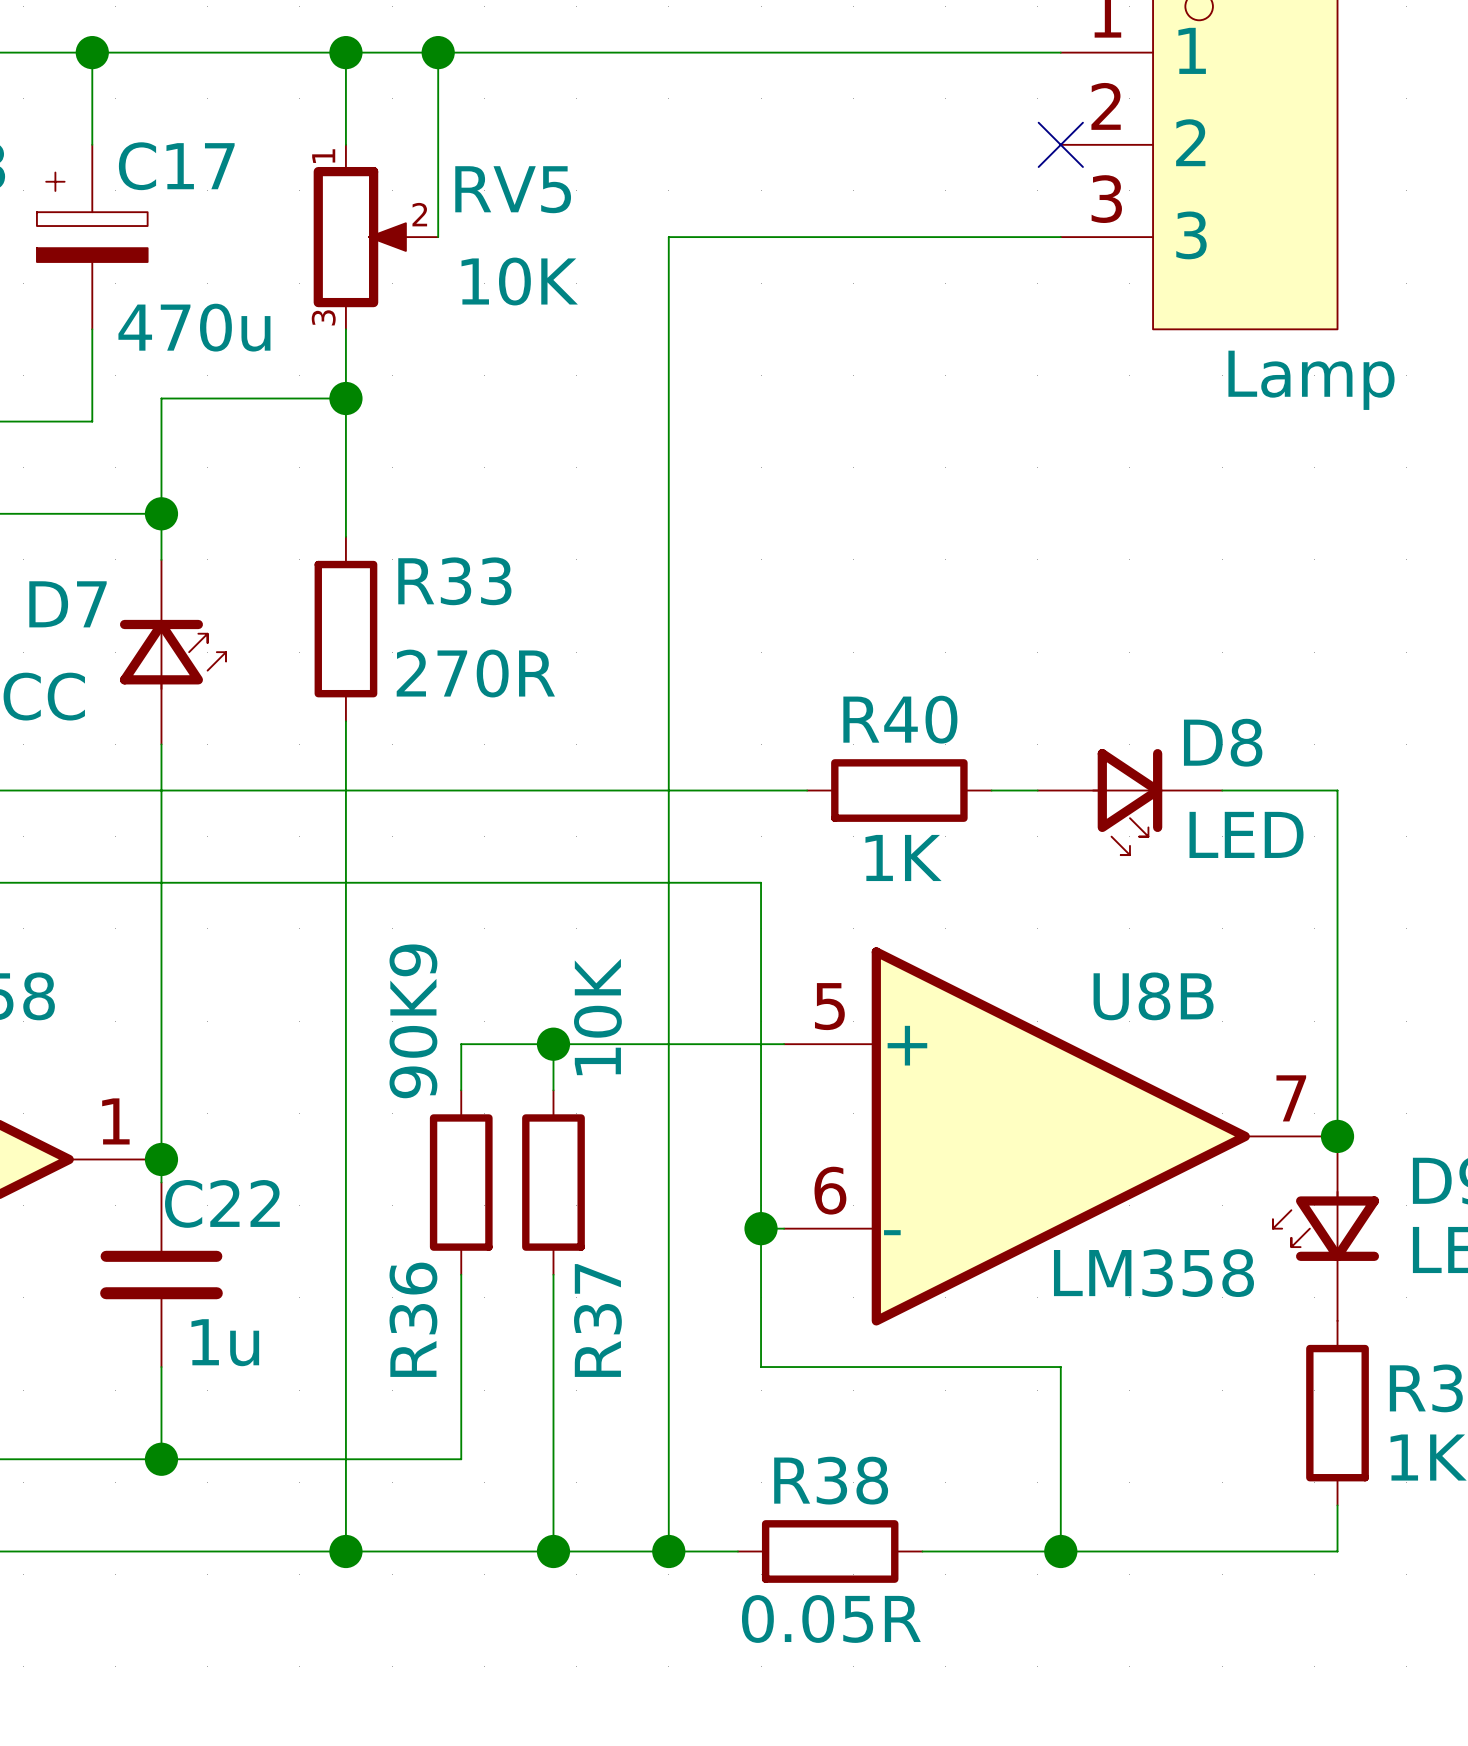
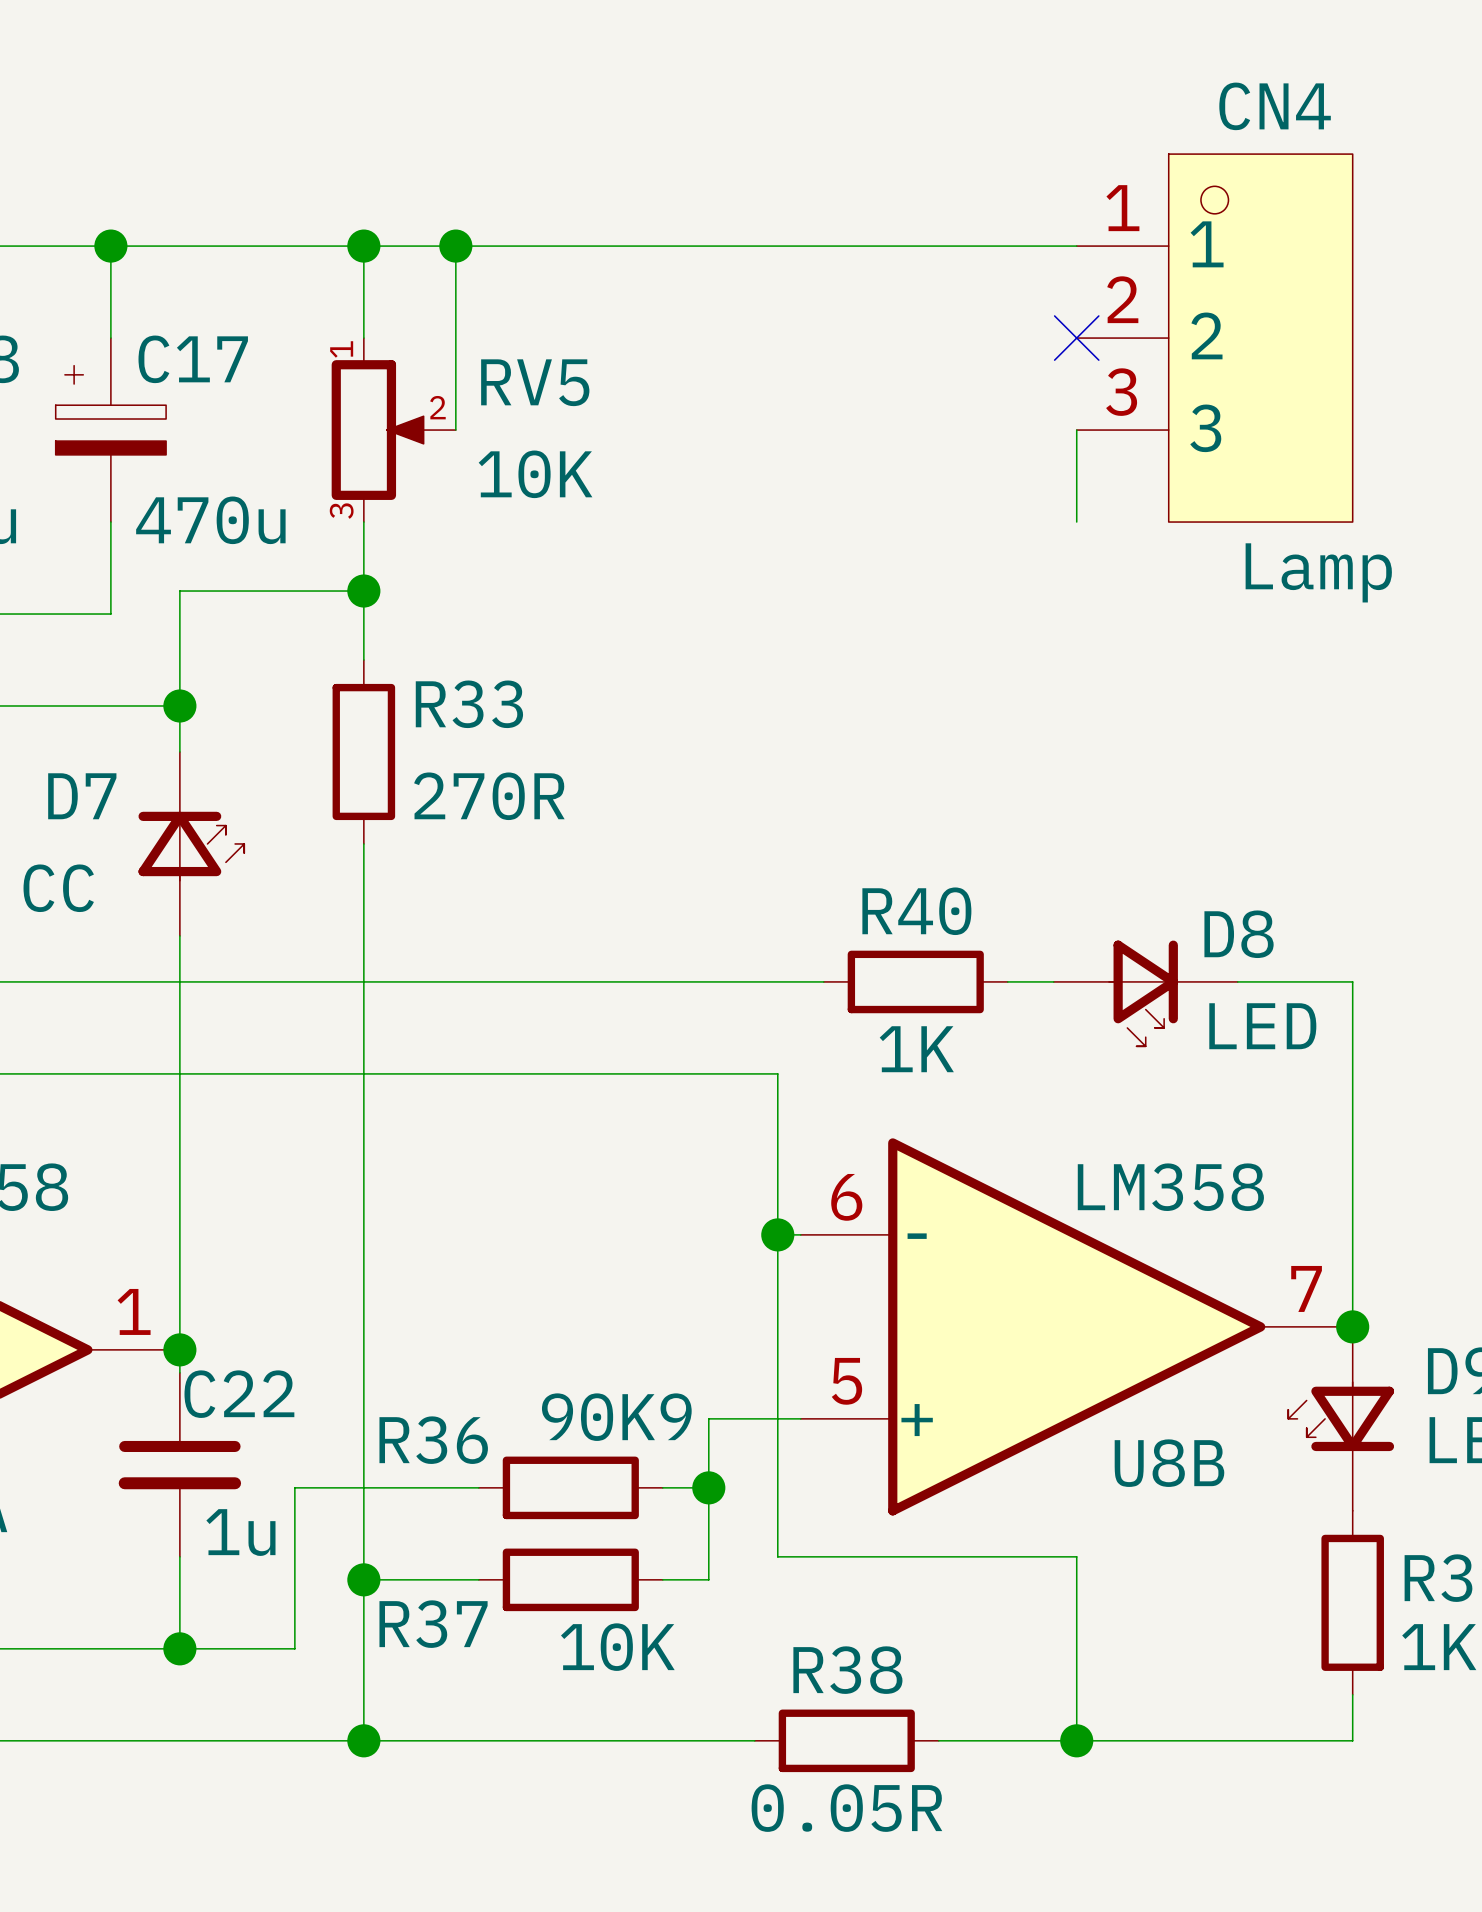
wire: (1060, 237) (668, 237) (668, 1551) -> (1076, 430) (1076, 522)
wire: (345, 467) (345, 536) -> (363, 843) (363, 912)
R33 position: (345, 629) -> (363, 751)
R37 value position: 10K (597, 1016) -> 10K (617, 1647)
R36 value position: 90K9 (413, 1021) -> 90K9 (616, 1417)
wire: (553, 1044) (553, 1090) -> none
junction: (553, 1044) -> none
wire: (761, 1044) (461, 1044) (461, 1090) -> none
junction: none -> (777, 1234)
U8B flip: as is (1060, 1136) -> up-down (1076, 1326)
R36 rotation: 0° (461, 1182) -> 90° clockwise (570, 1487)
R36 position: (461, 1182) -> (570, 1487)
R37 rotation: 0° (553, 1182) -> 90° clockwise (570, 1579)
R37 position: (553, 1182) -> (570, 1579)
wire: none -> (777, 1418) (708, 1418) (708, 1579) (662, 1579)
junction: (761, 1228) -> none
wire: (461, 1274) (461, 1459) (276, 1459) -> (478, 1487) (294, 1487) (294, 1648)
wire: (553, 1274) (553, 1551) -> none
wire: none -> (662, 1487) (708, 1487)
junction: none -> (708, 1487)
wire: none -> (363, 1579) (478, 1579)
junction: none -> (363, 1579)
junction: (553, 1551) -> none
junction: (668, 1551) -> none

